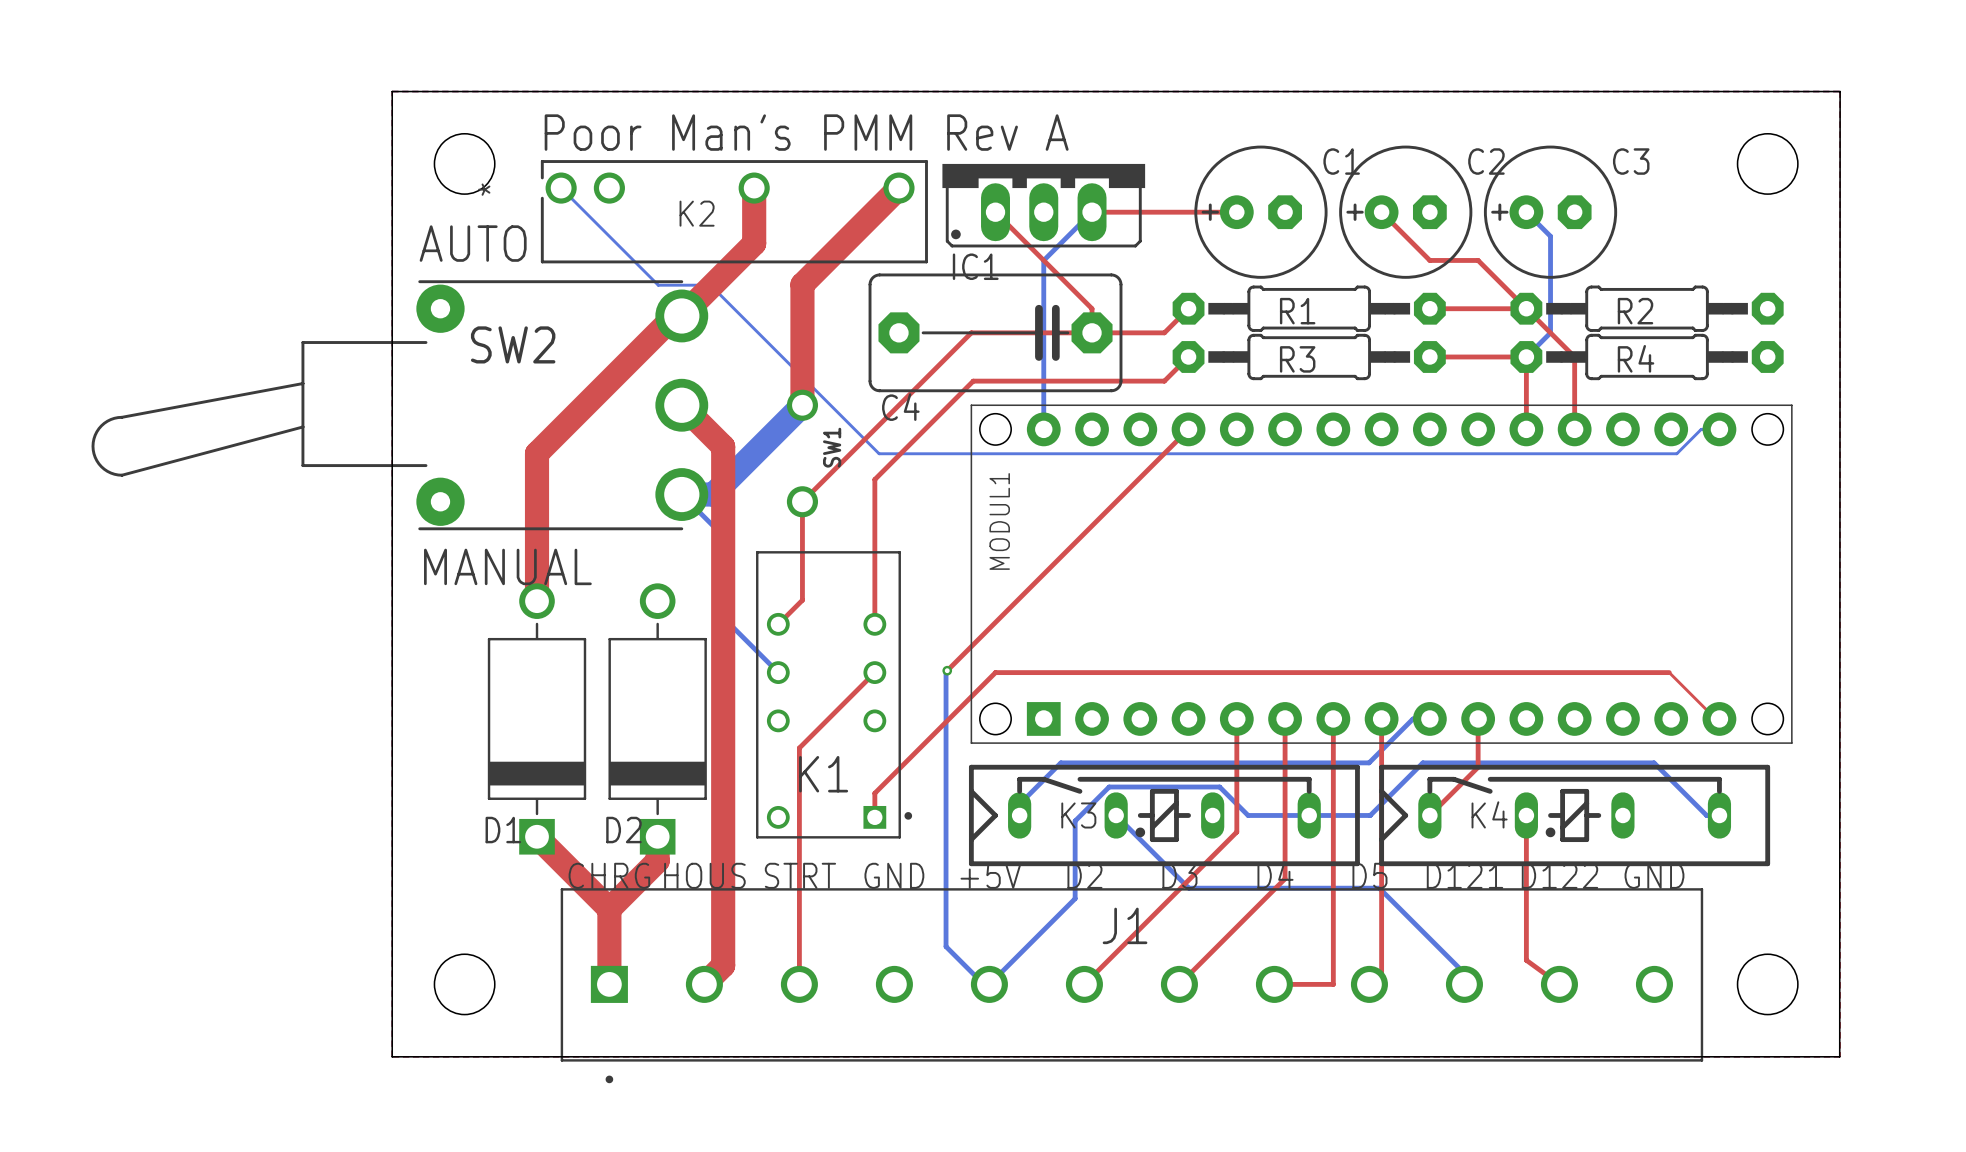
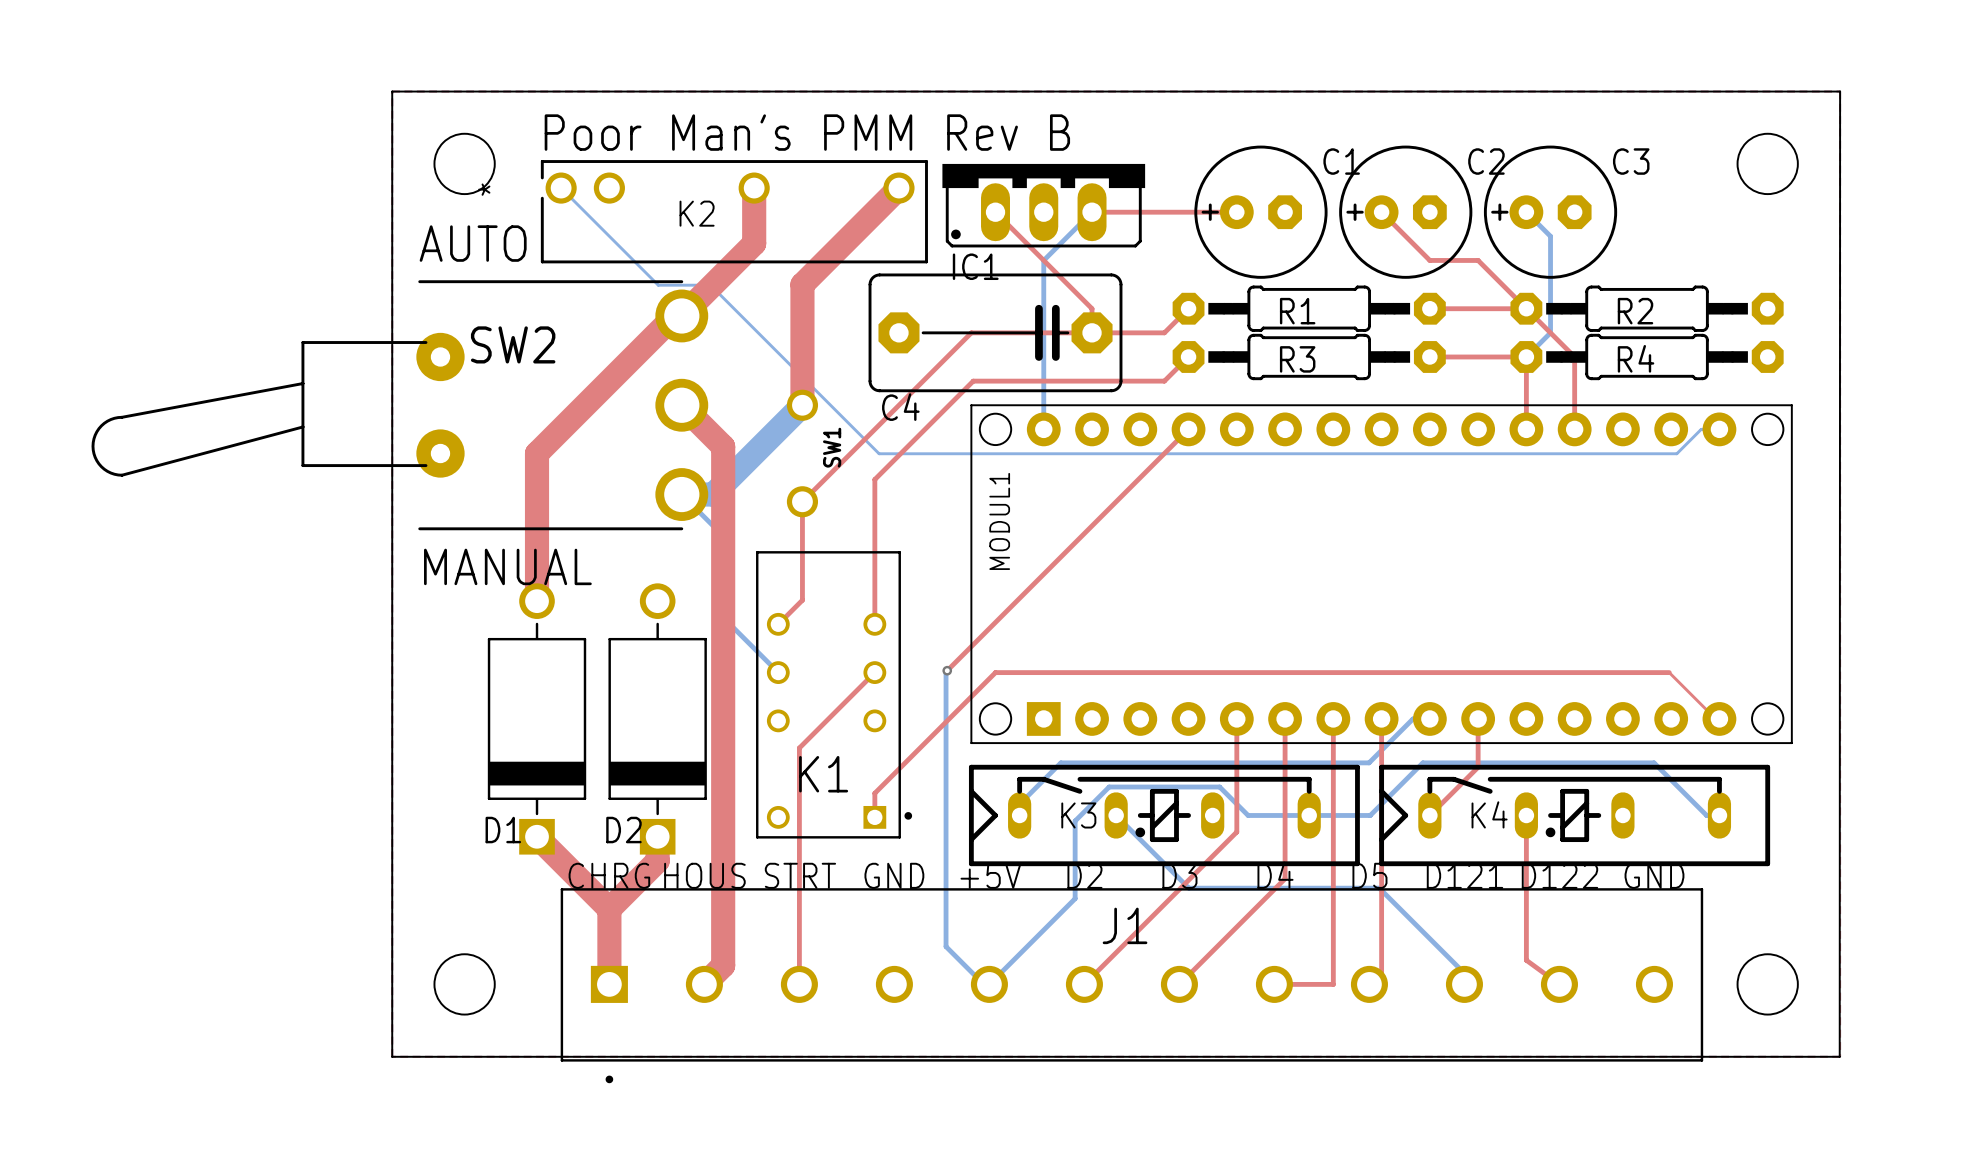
text: Poor Man's PMM Rev A (806, 132) -> Poor Man's PMM Rev B (807, 132)
SW2 footprint: [91, 280, 709, 531] -> [91, 280, 709, 531]

